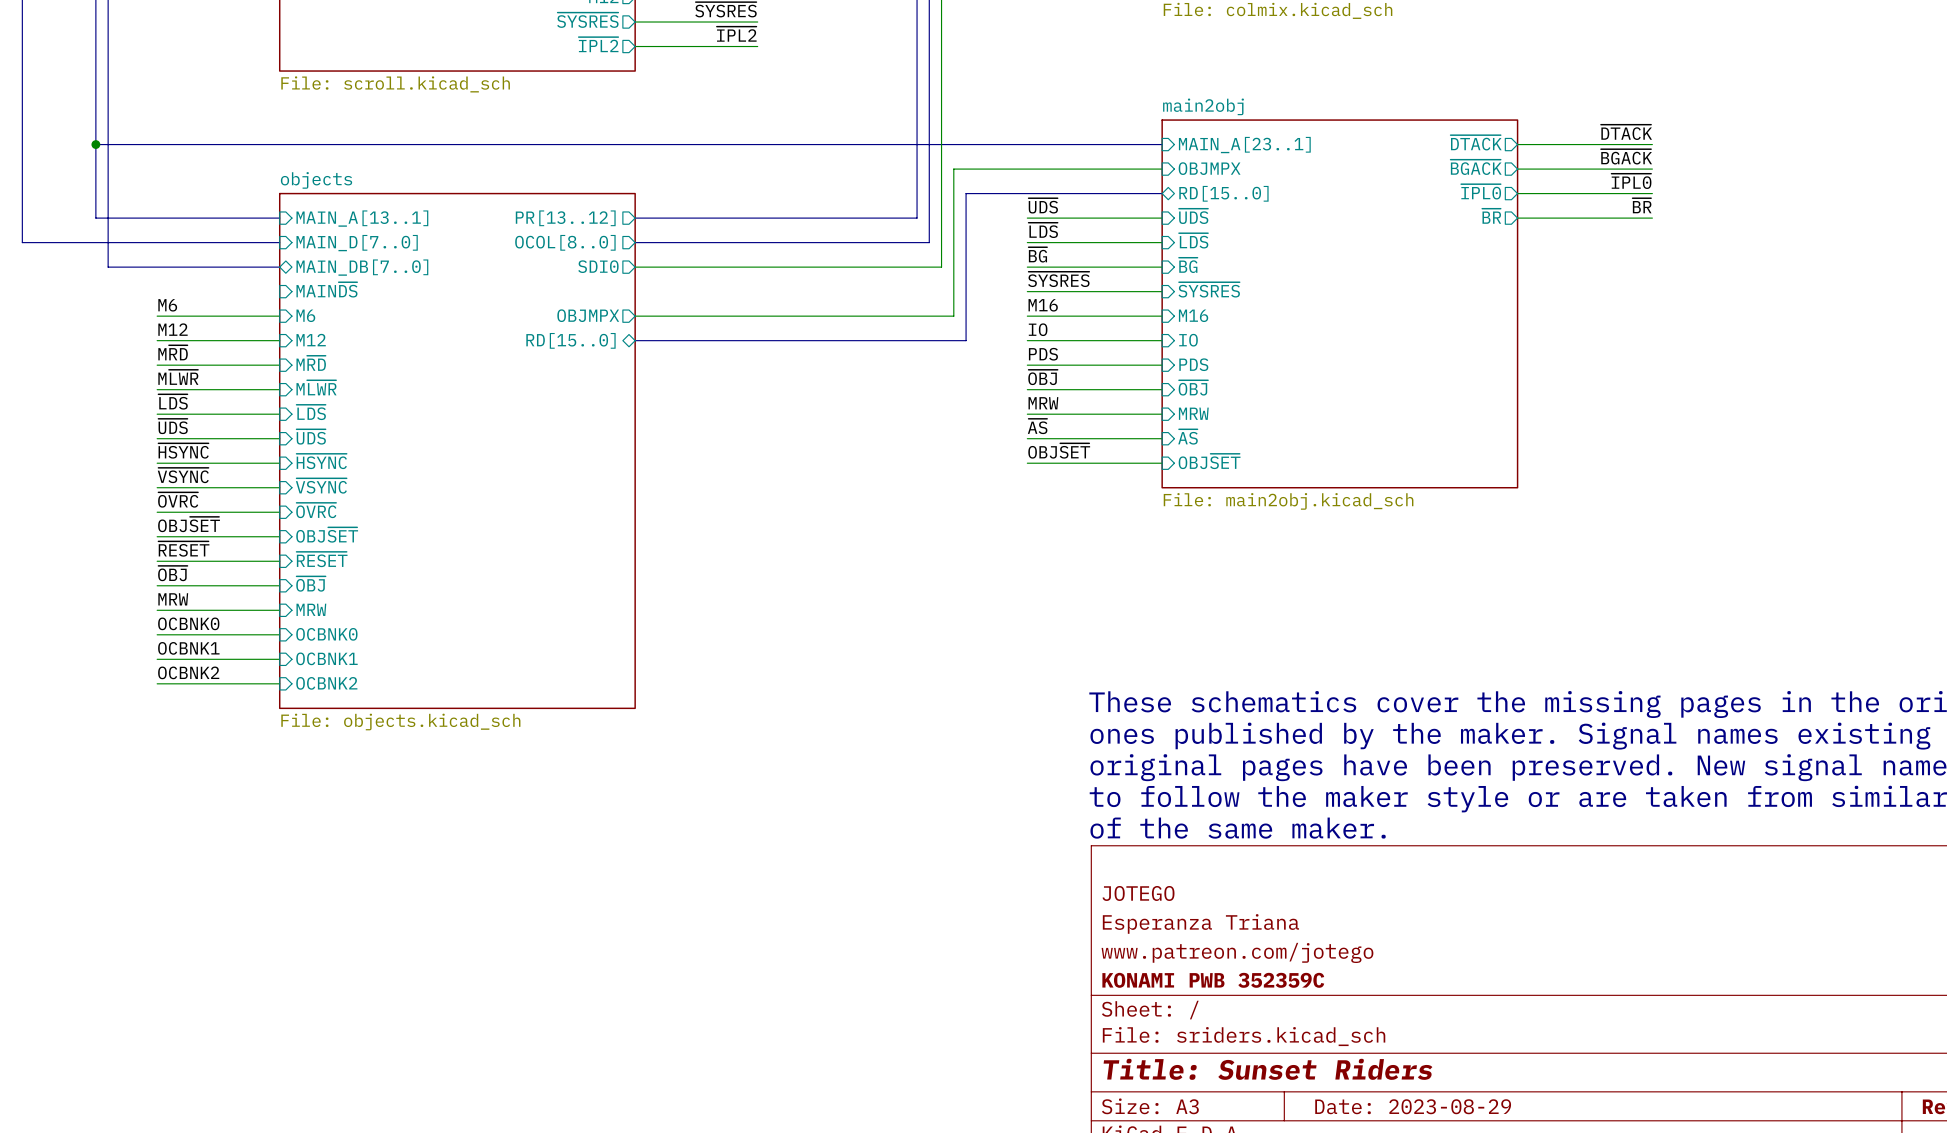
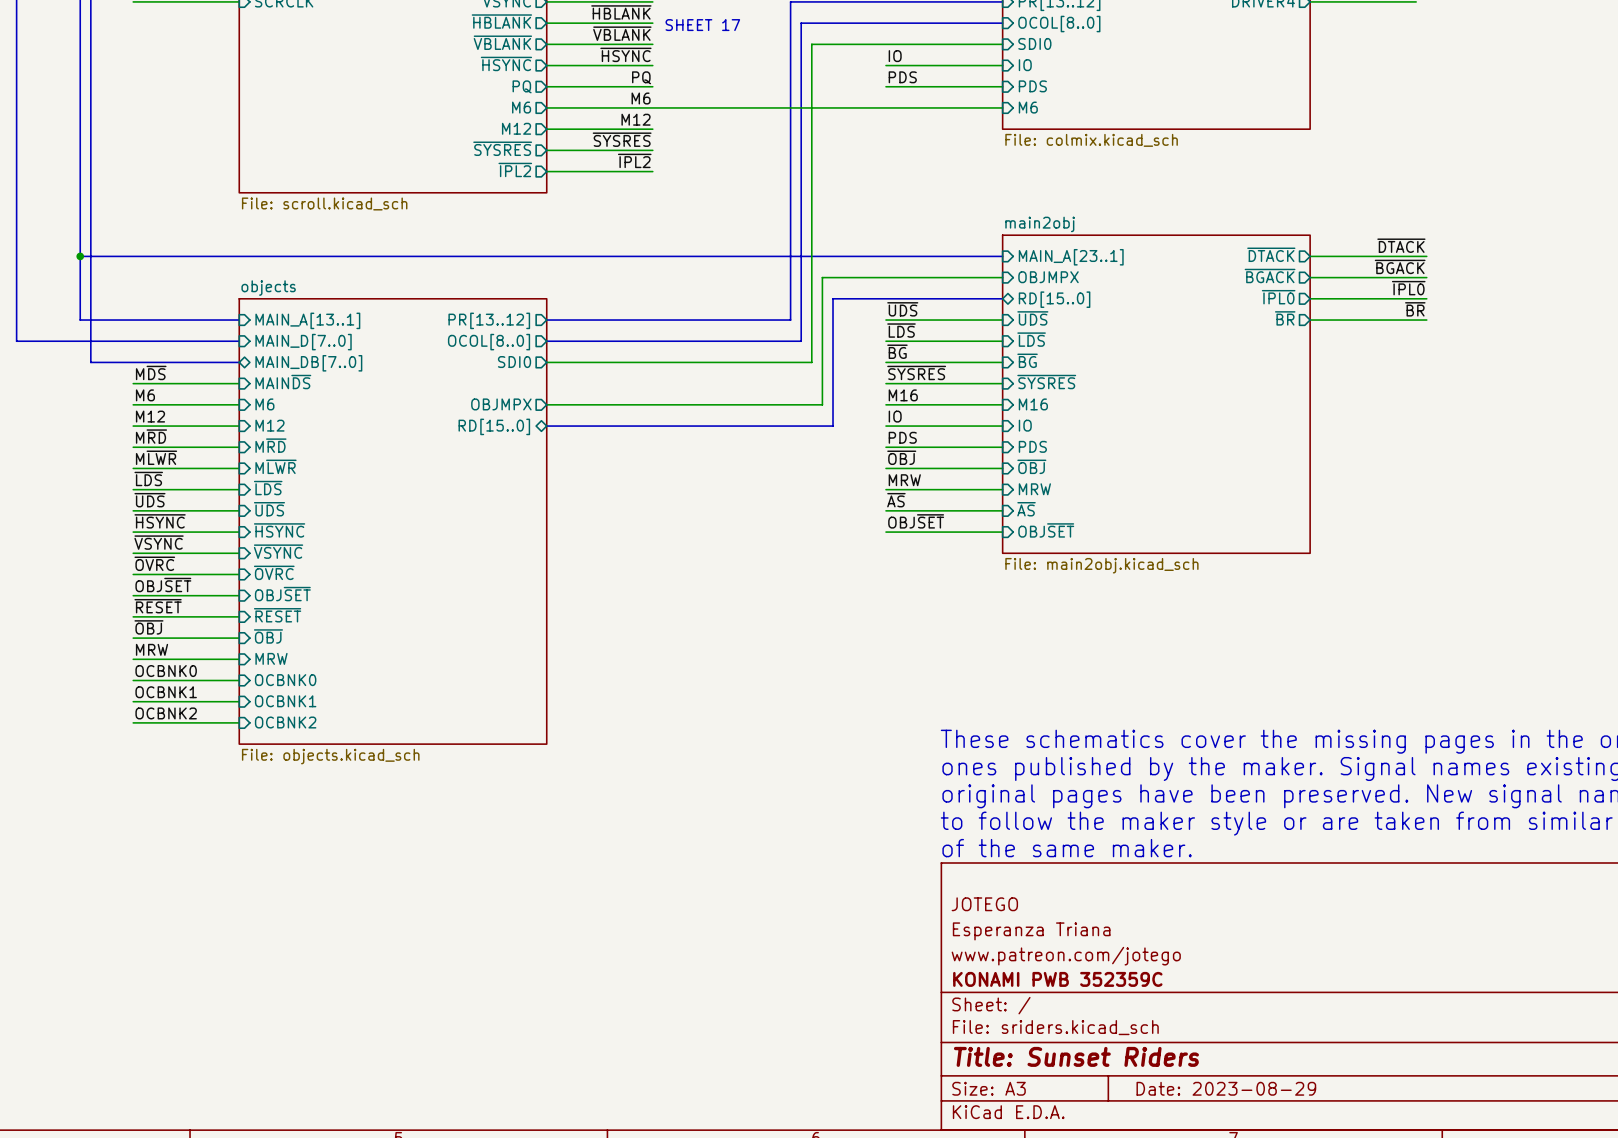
label: none -> M~{DS} (151, 372)
wire: none -> (133, 383) (239, 383)

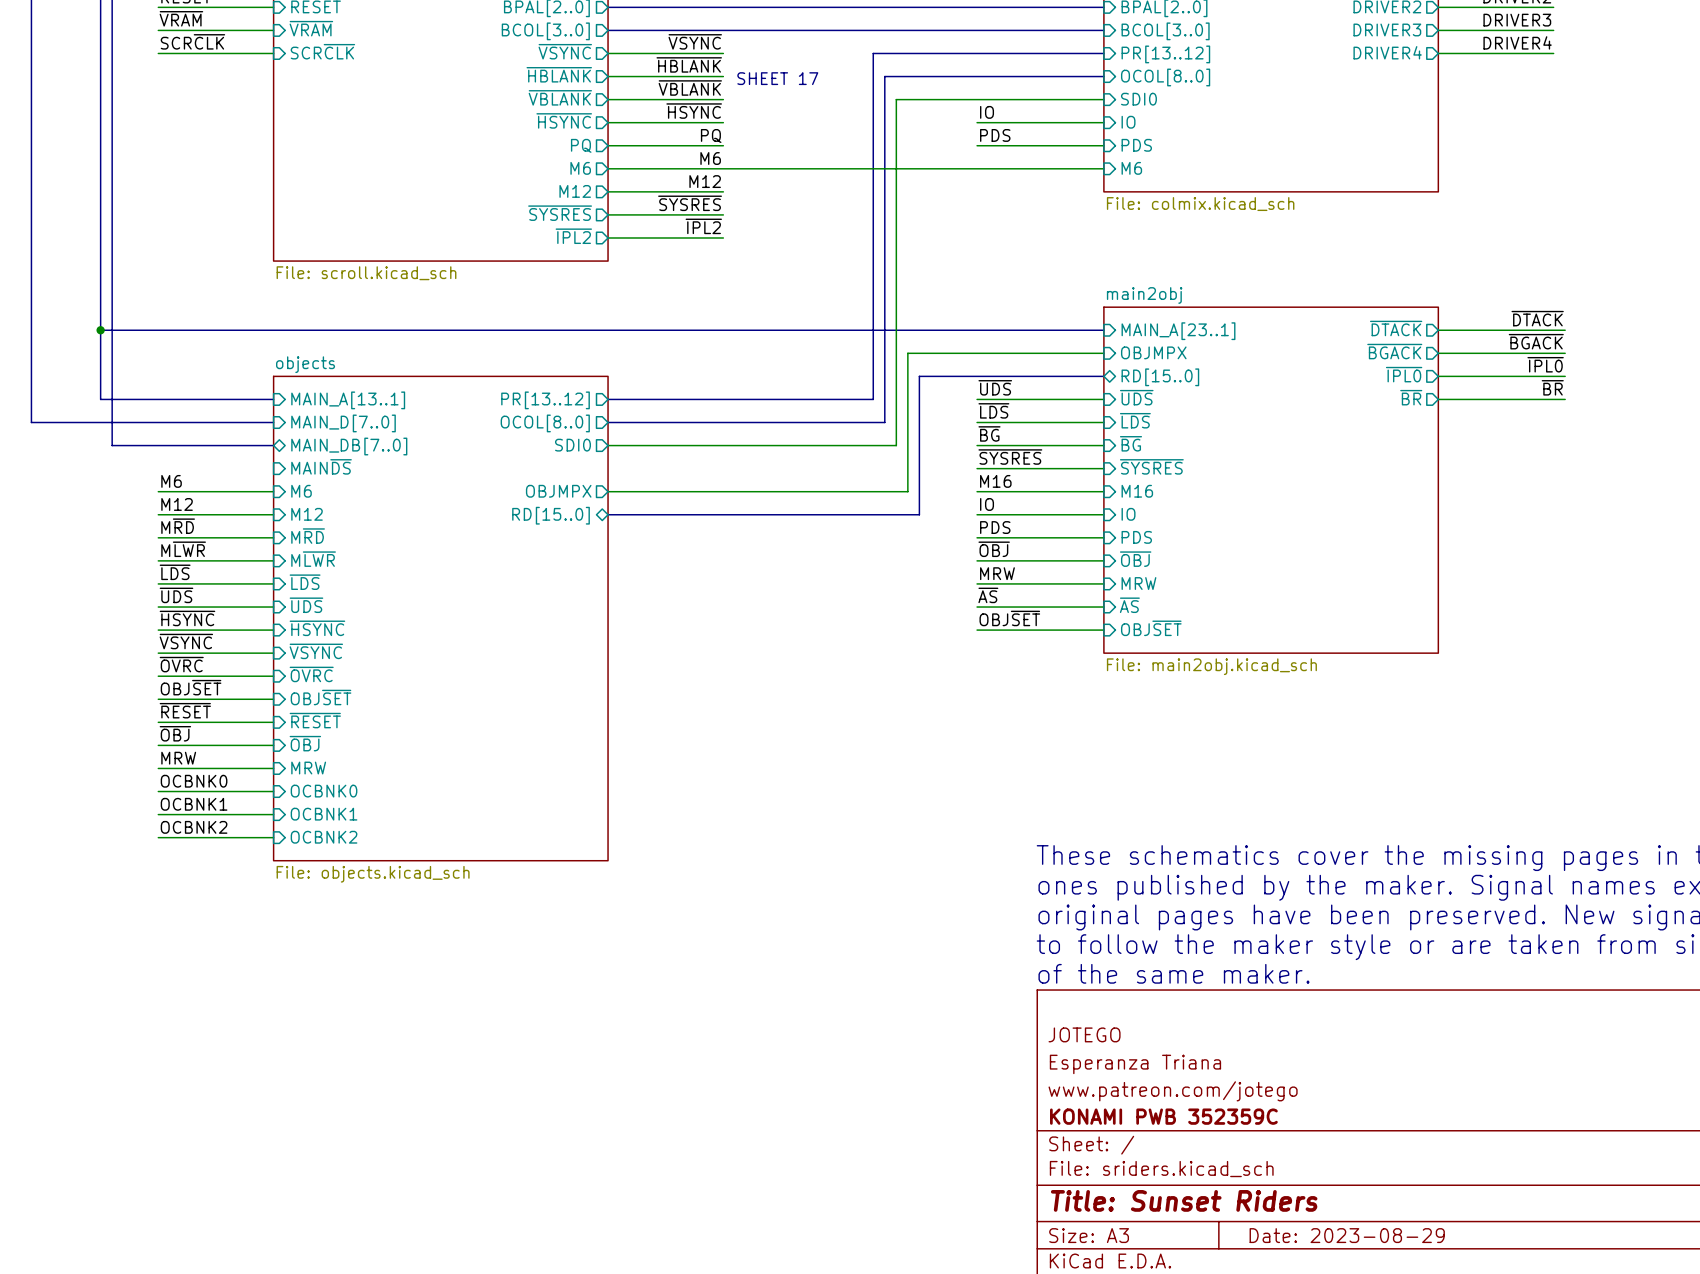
label: M~{DS} (151, 372) -> none
wire: (133, 383) (239, 383) -> none

